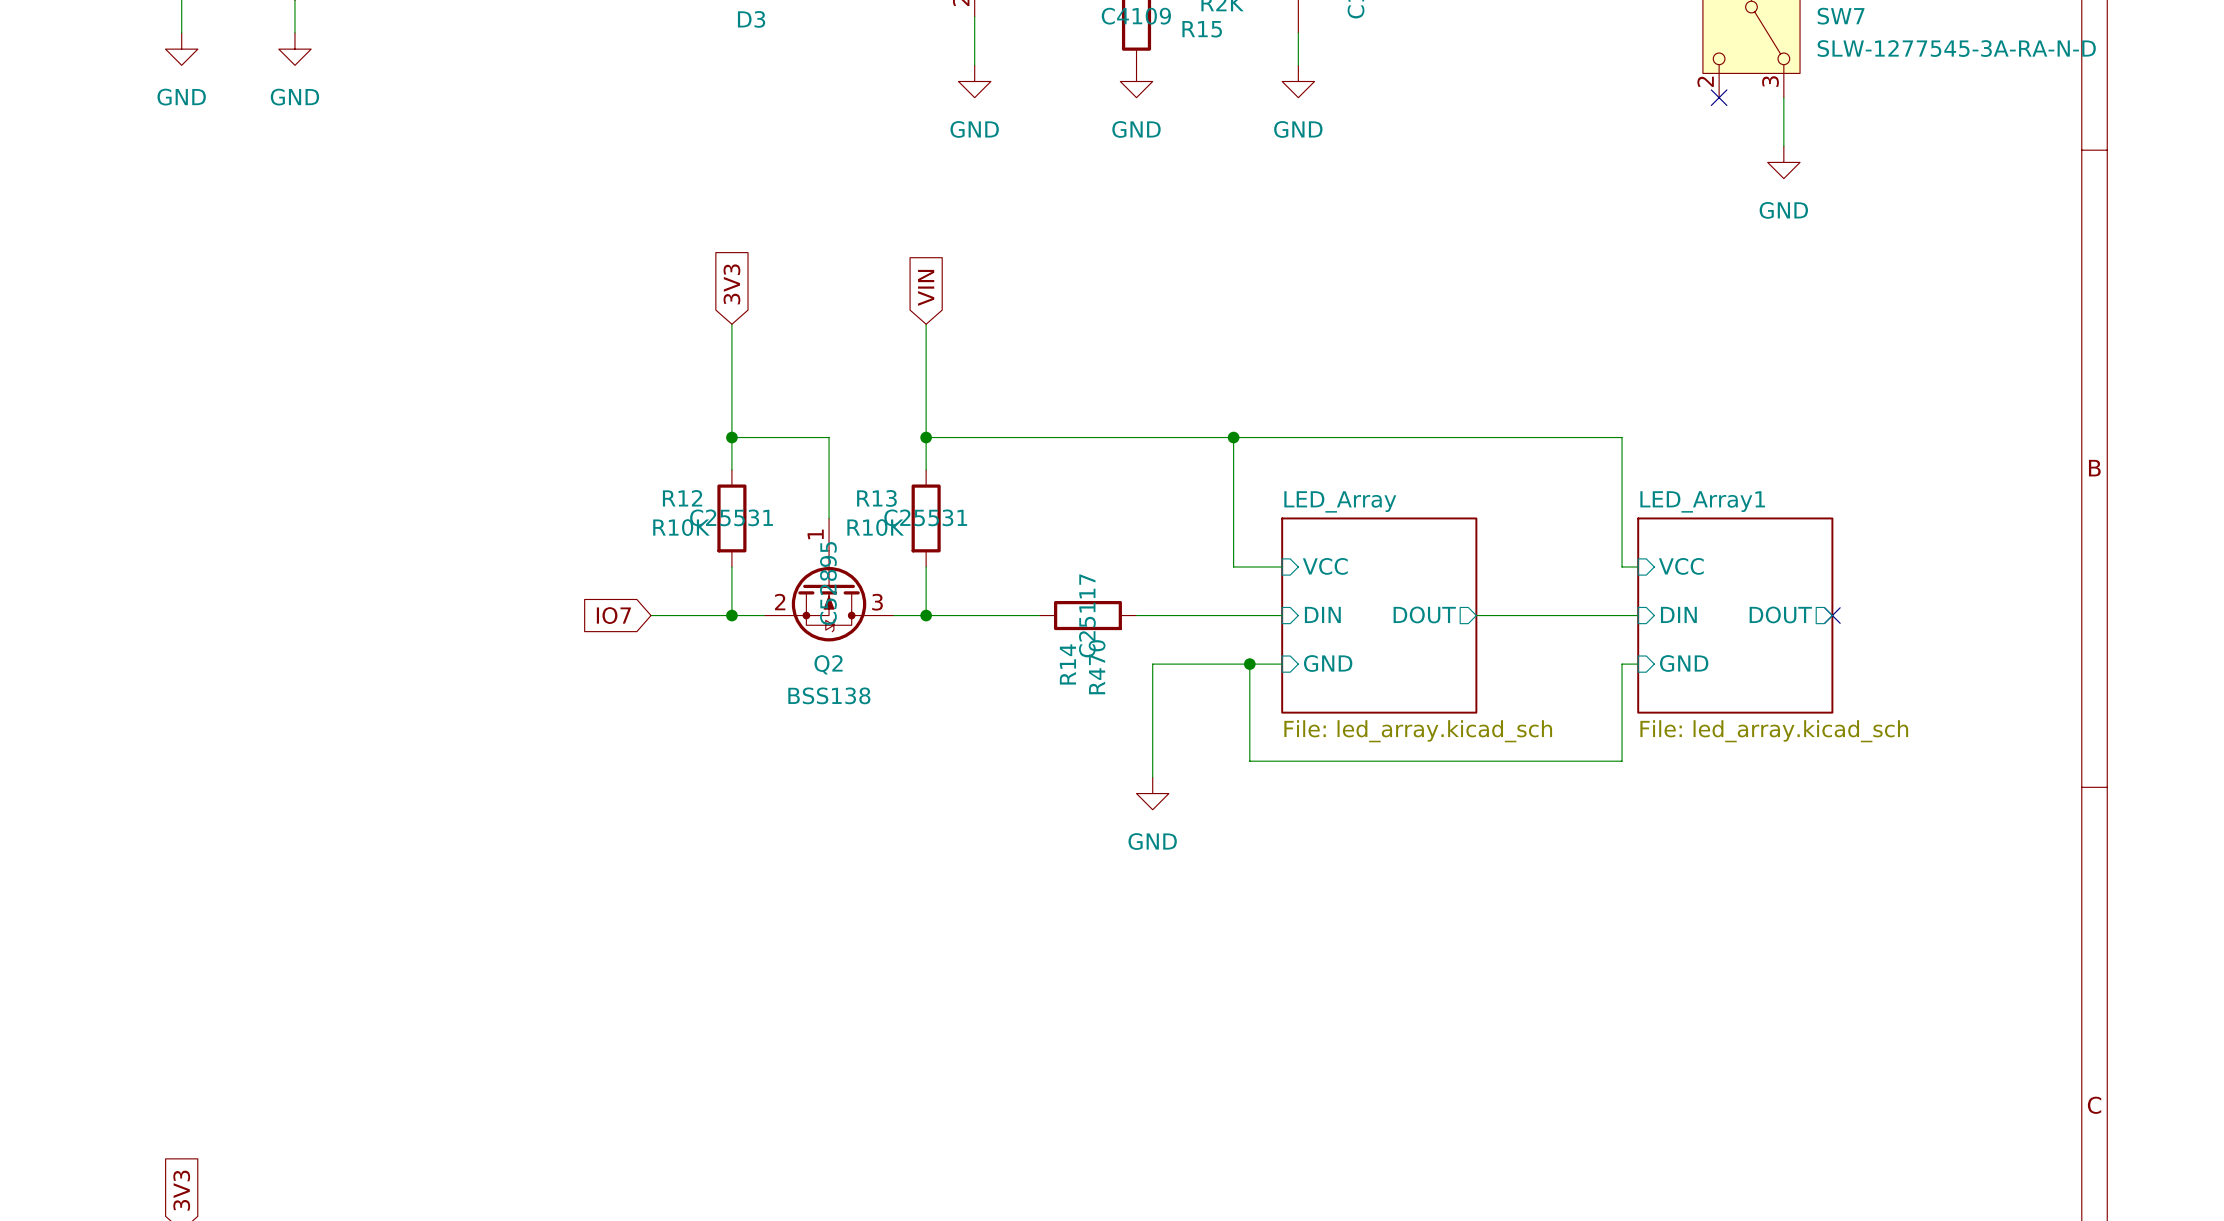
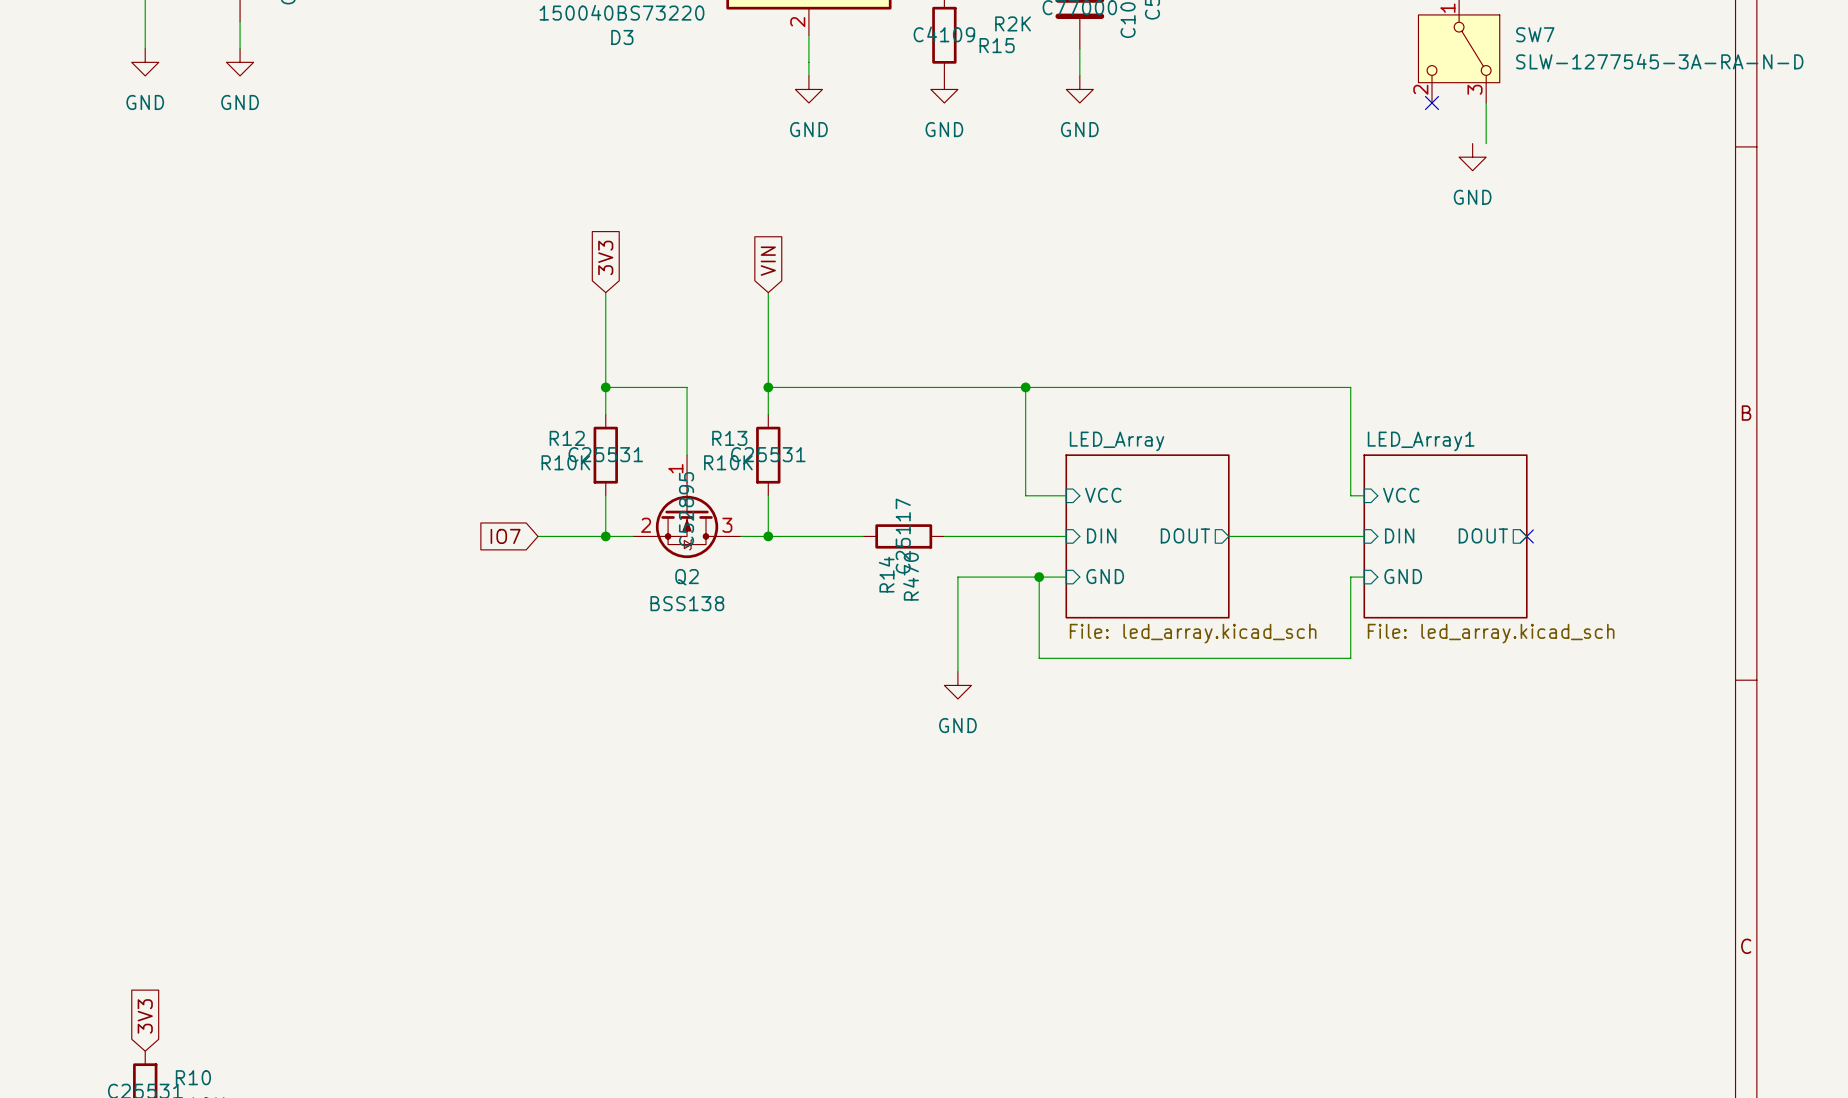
power symbol position: GND (1783, 162) -> GND (1472, 157)

